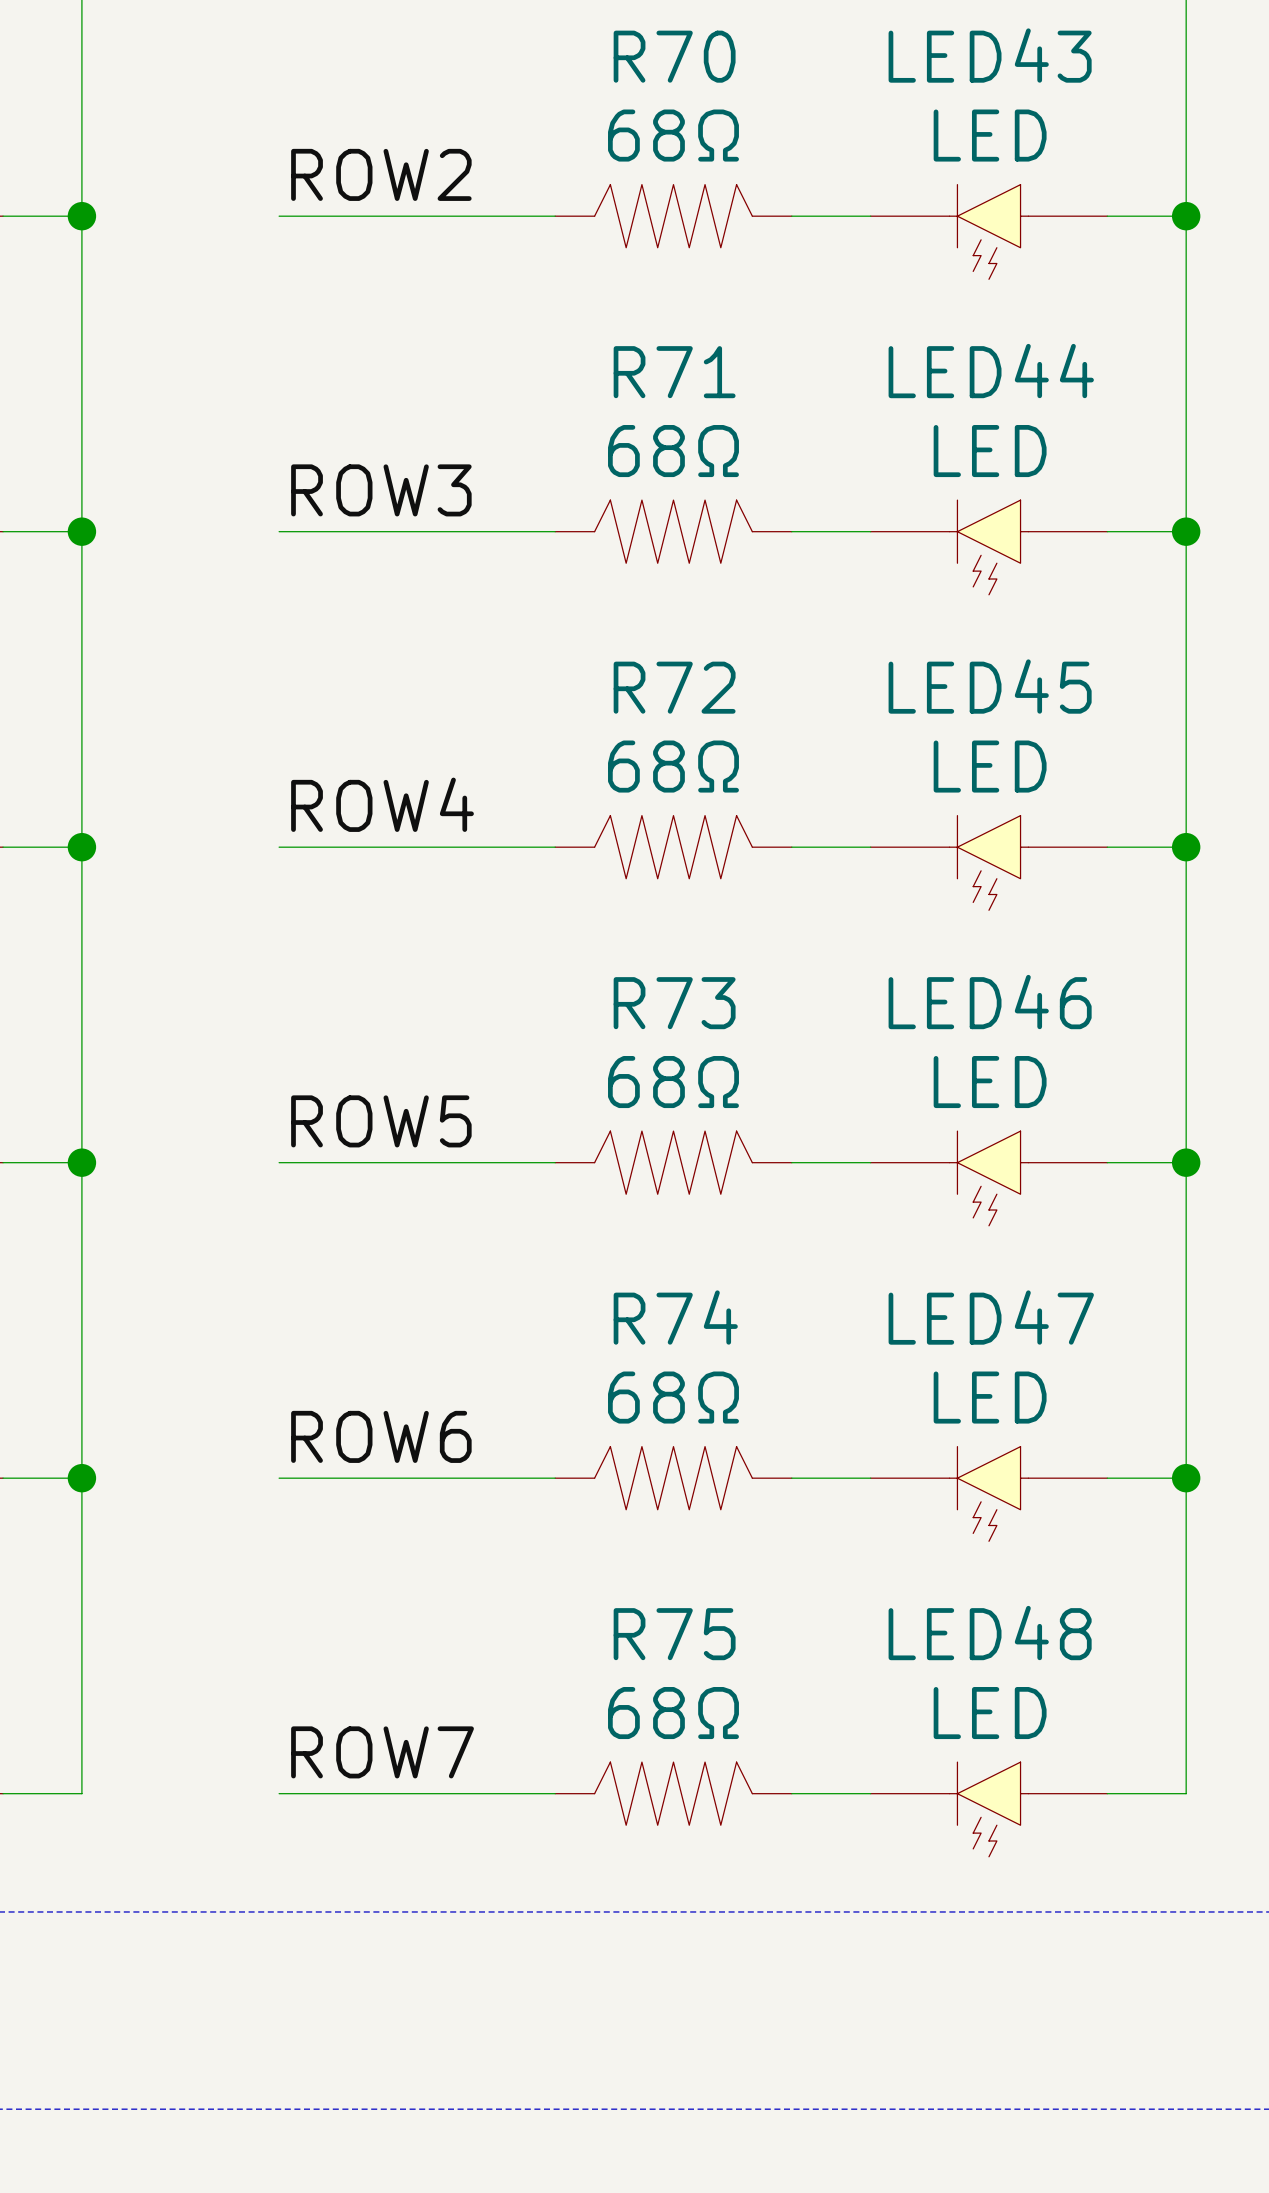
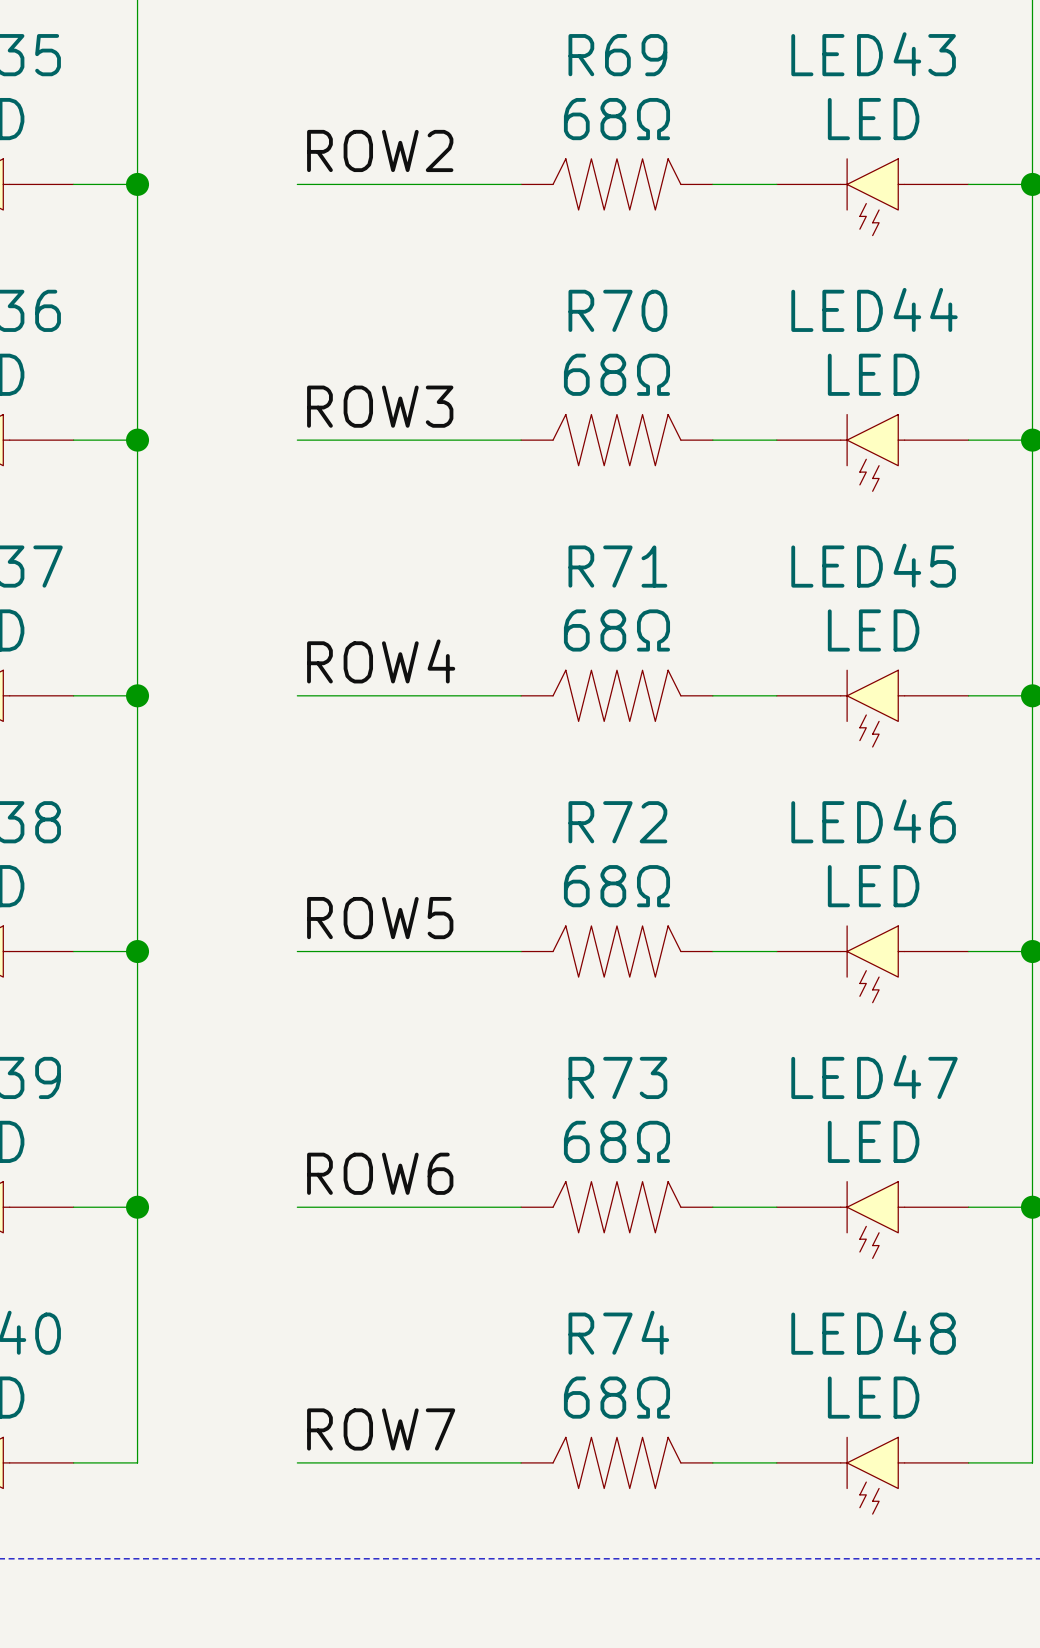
R70 name: R70 (674, 56) -> R69 (617, 55)
R71 name: R71 (674, 372) -> R70 (617, 310)
R72 name: R72 (674, 687) -> R71 (617, 566)
R73 name: R73 (674, 1003) -> R72 (617, 822)
R74 name: R74 (675, 1317) -> R73 (617, 1077)
R75 name: R75 (674, 1634) -> R74 (618, 1332)

